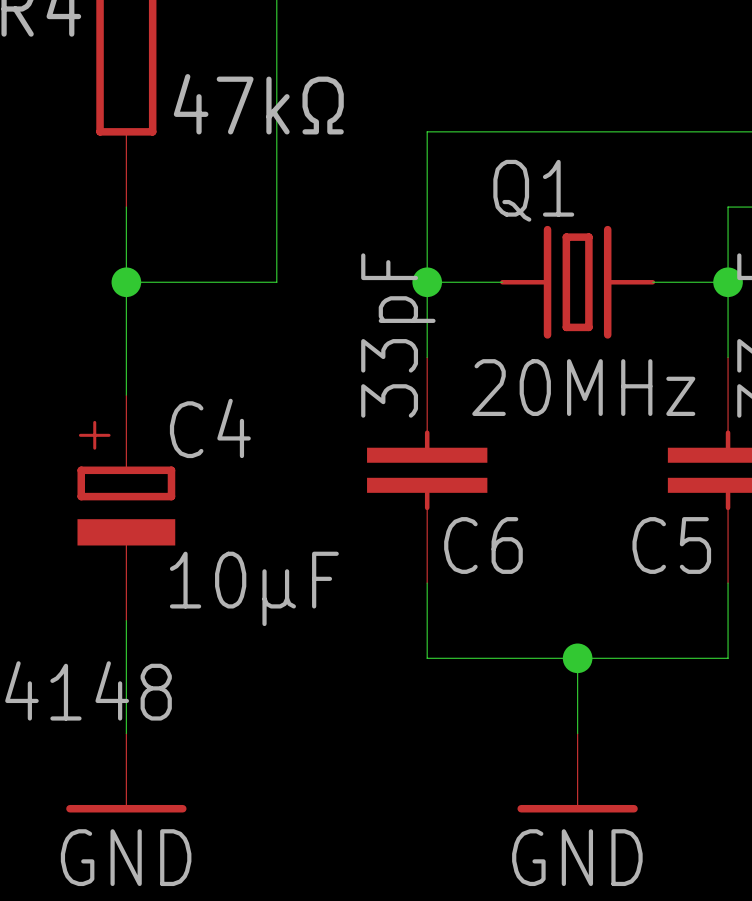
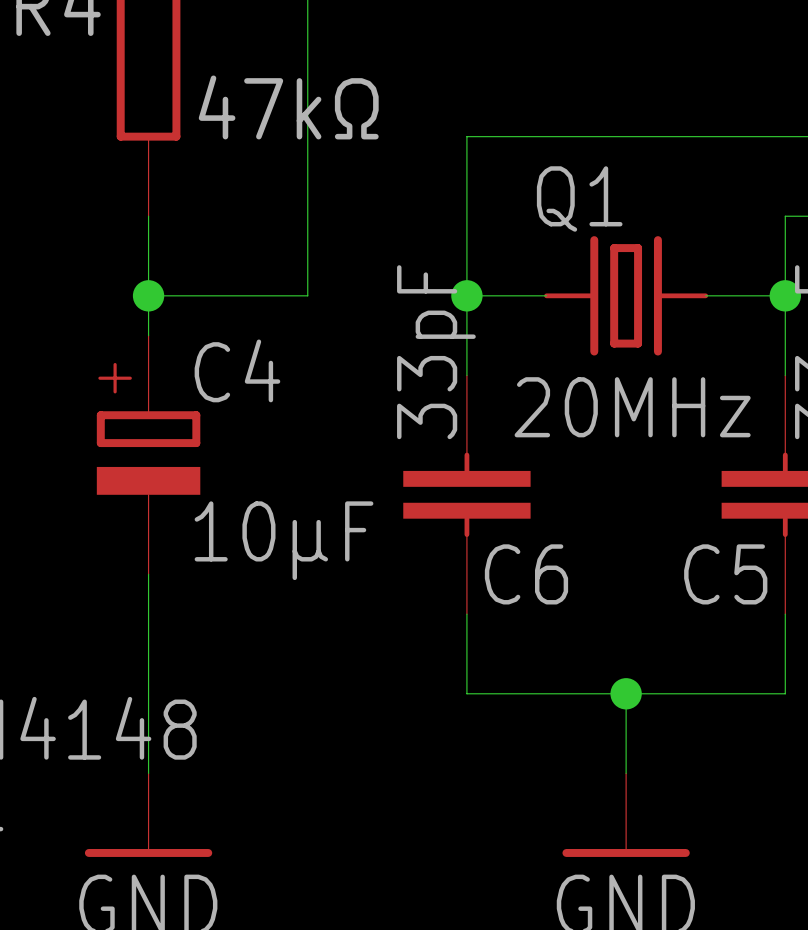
C4 position: (126, 507) -> (148, 455)

